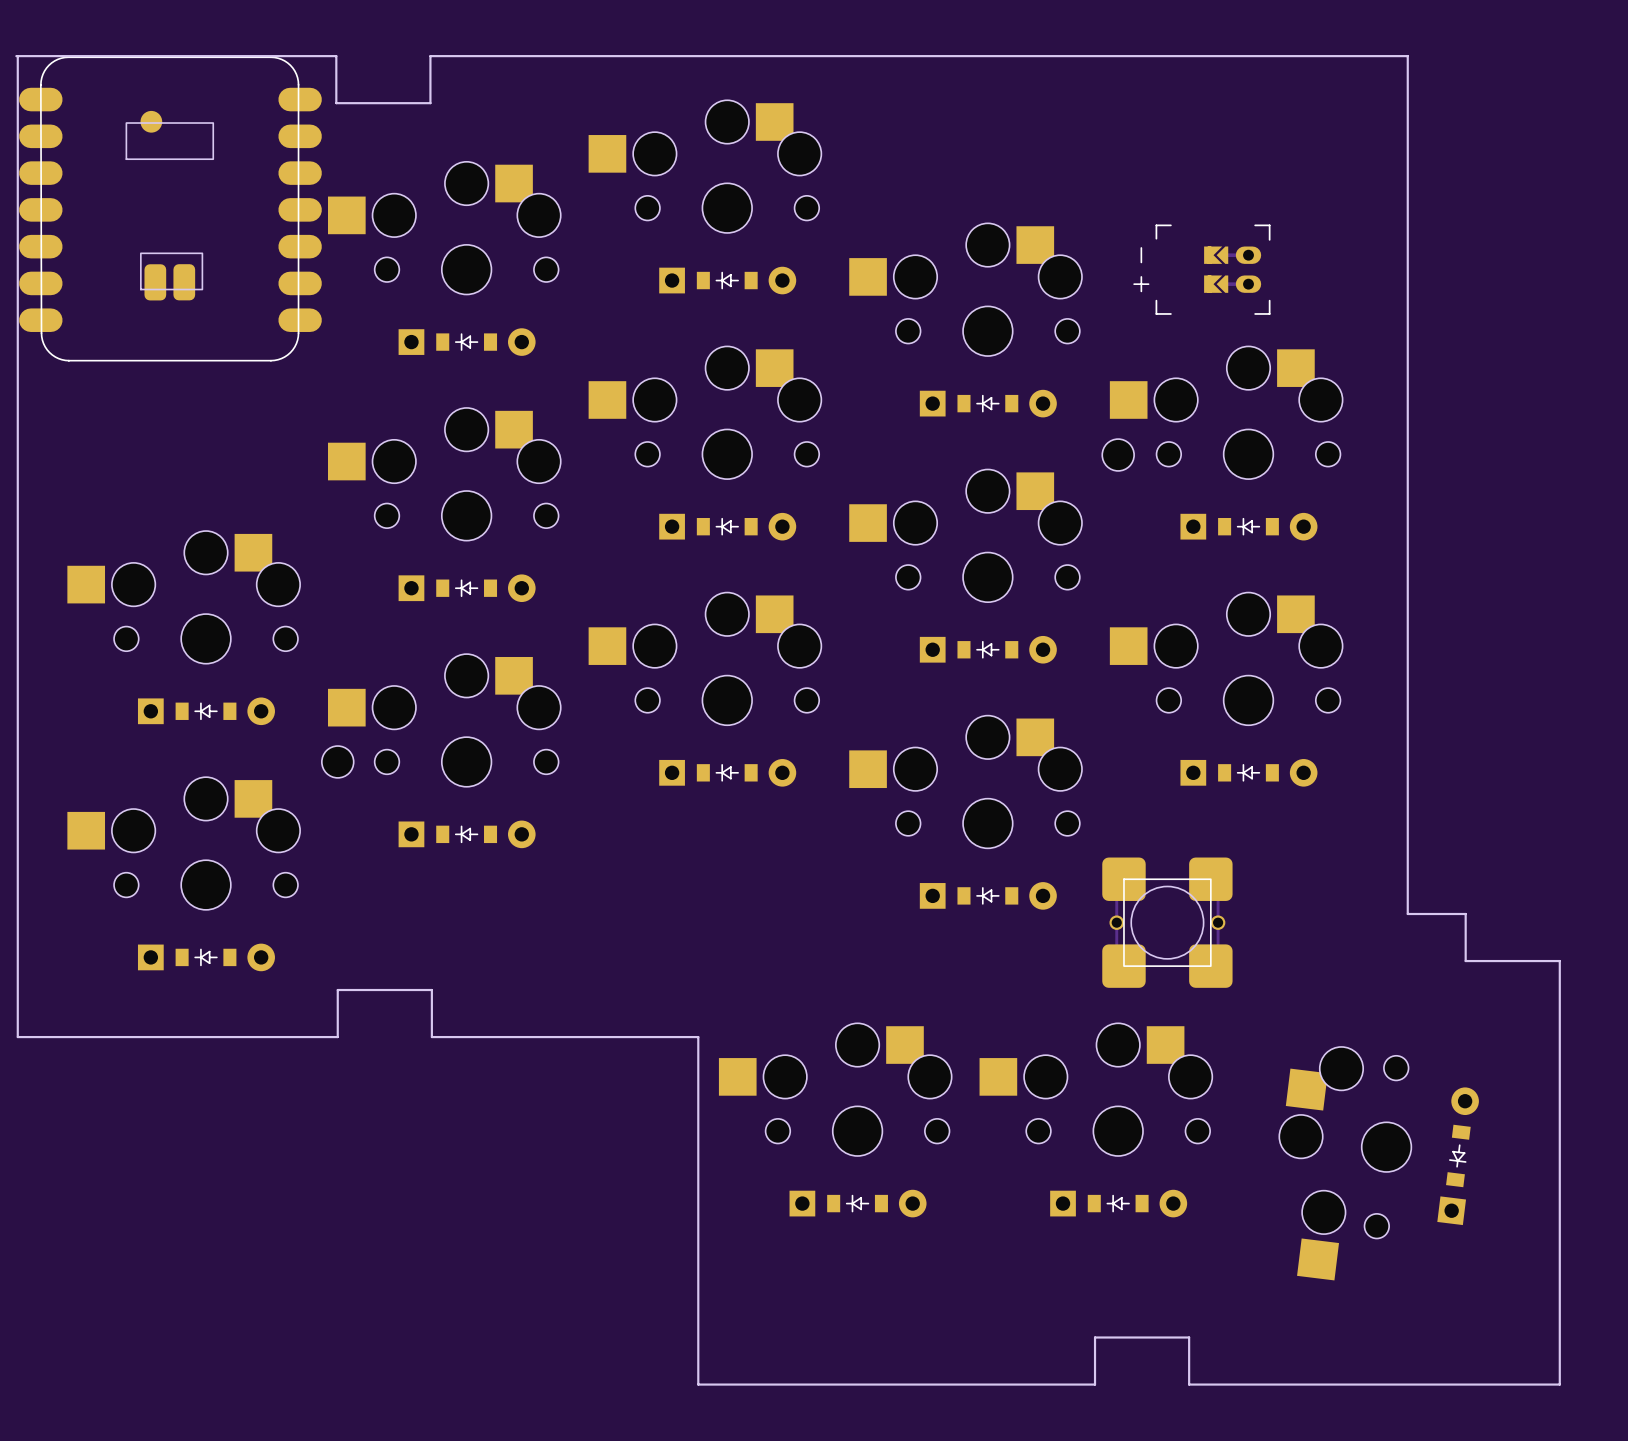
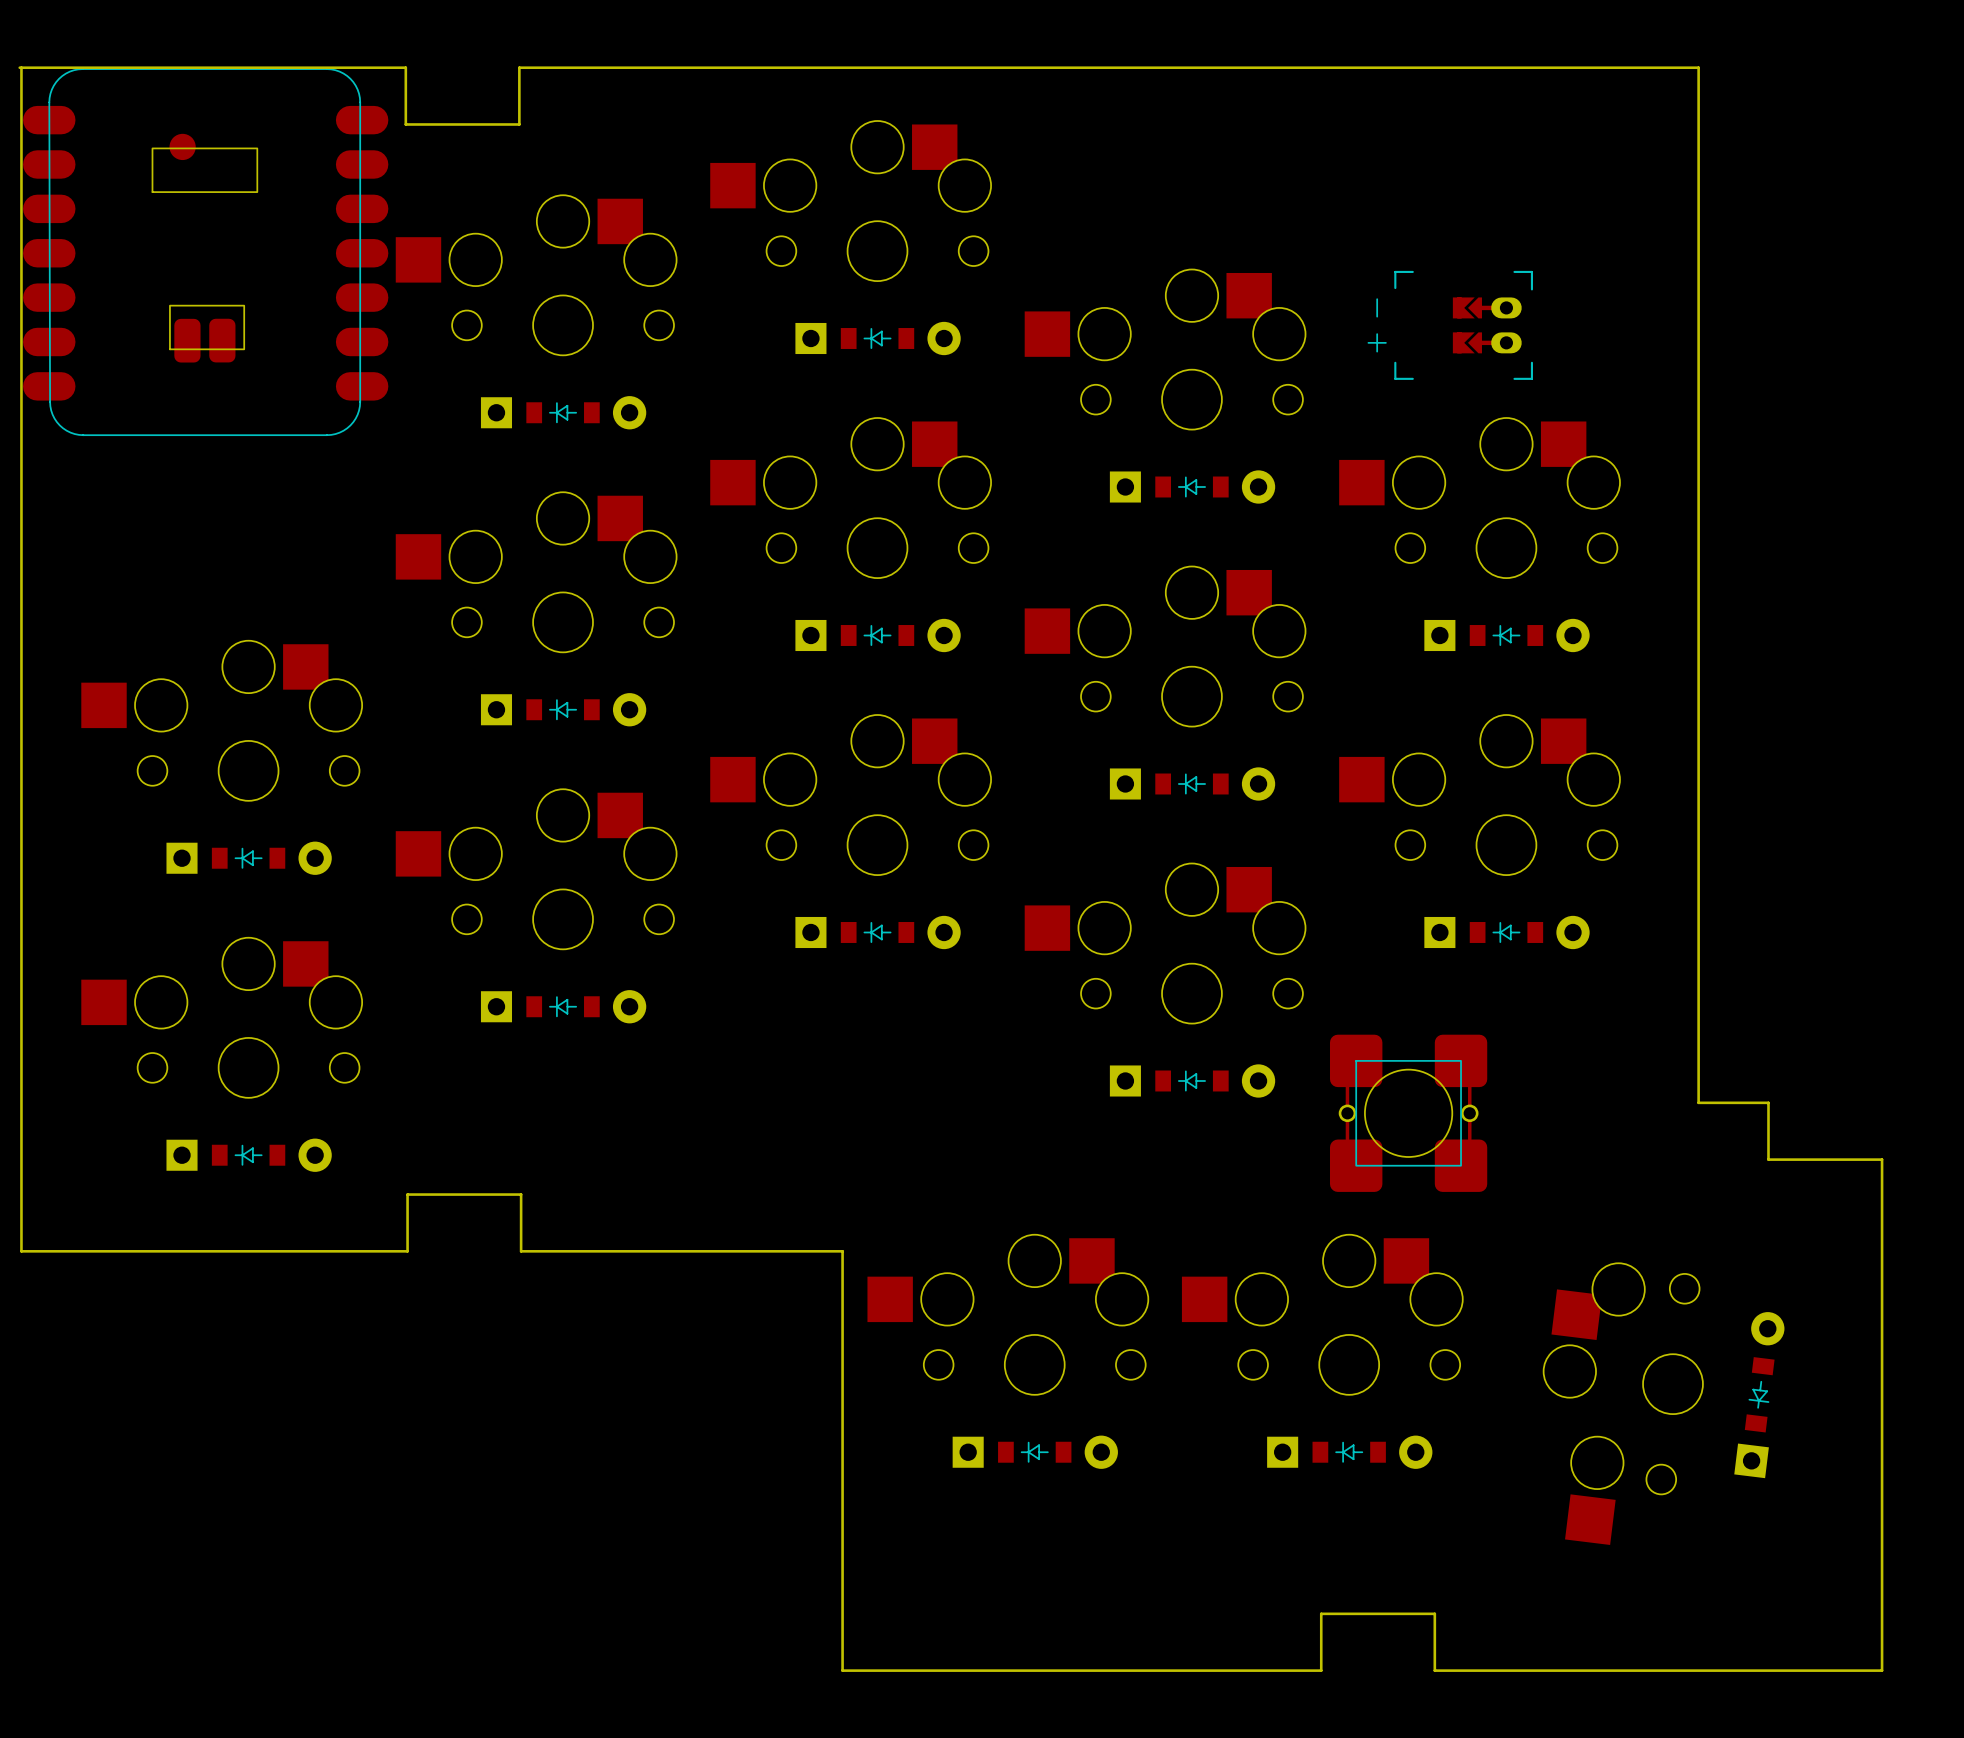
part: (1118, 455) -> none
part: (337, 761) -> none

